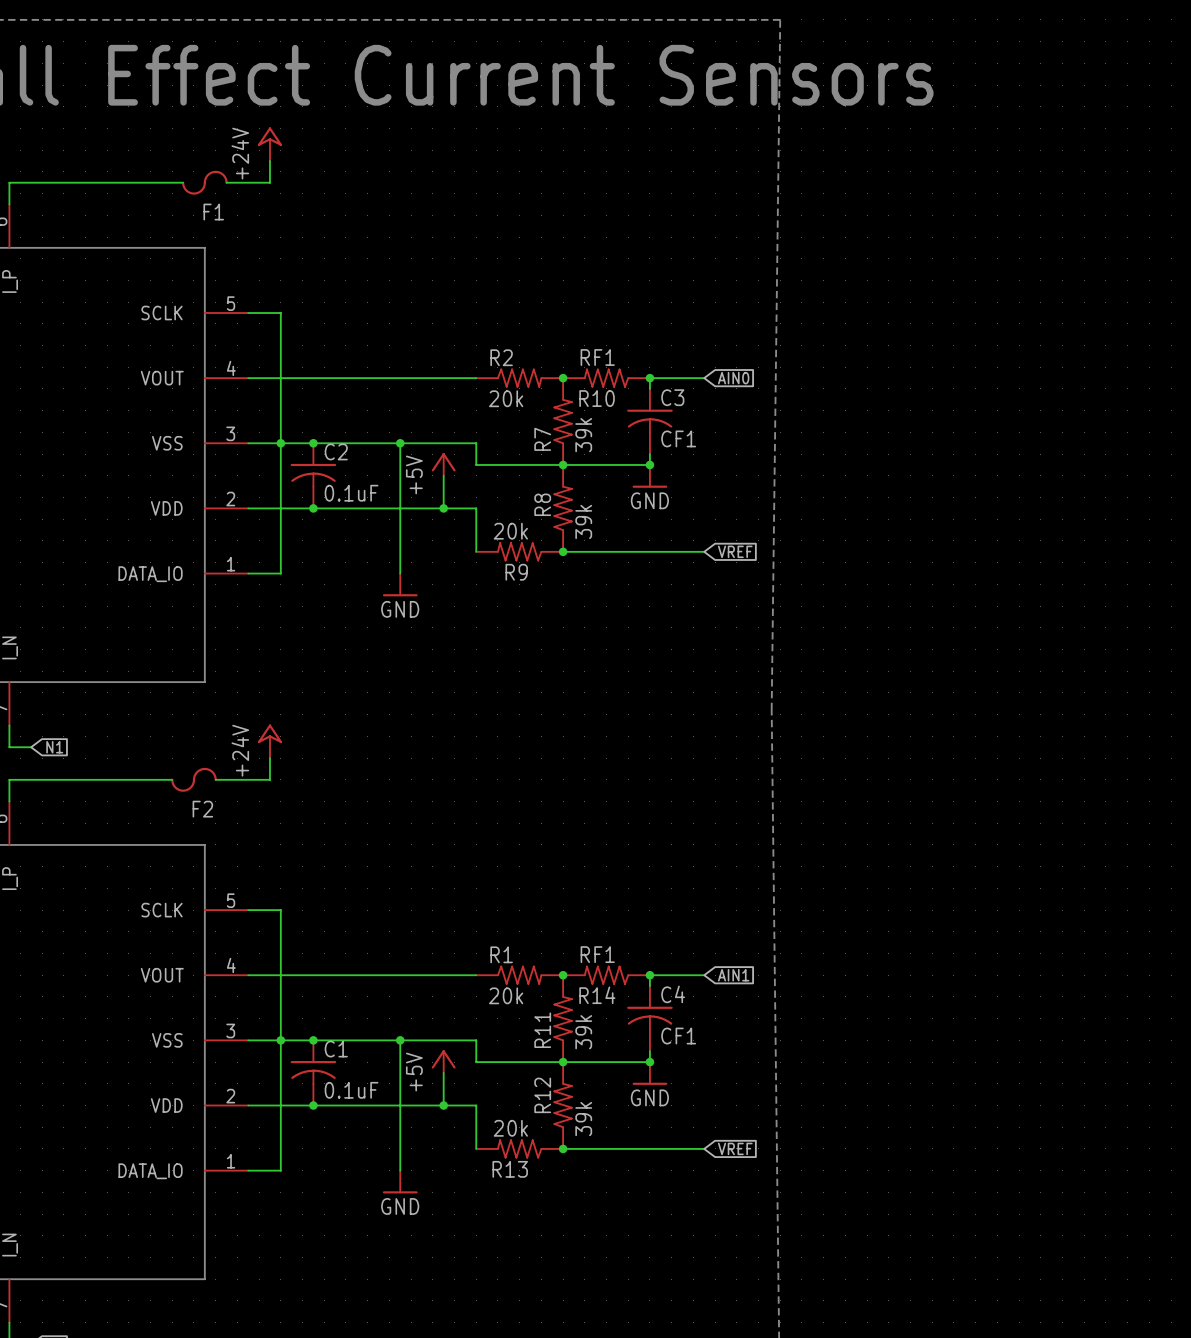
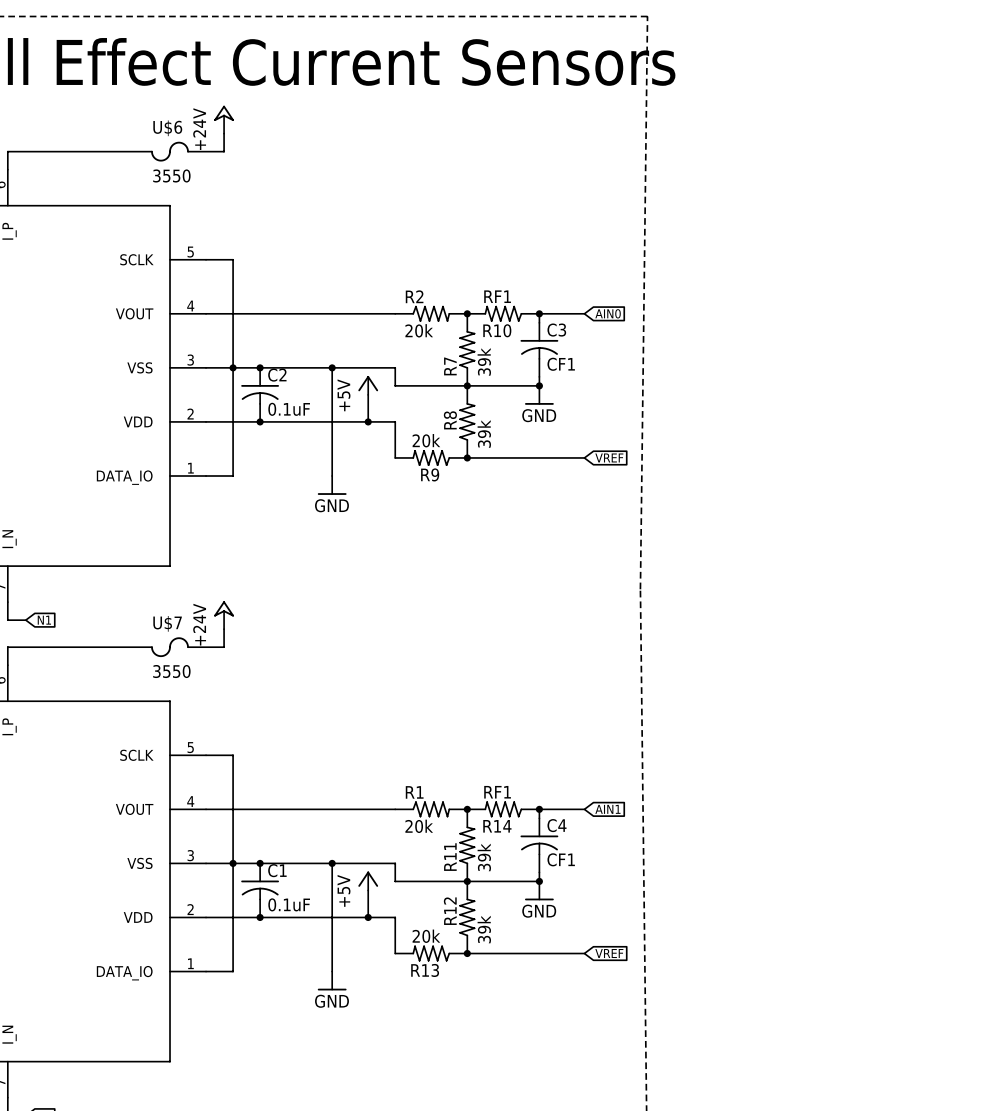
F1 value: none -> 3550 (171, 175)
F1 name: F1 (213, 212) -> U$6 (167, 128)
F2: (193, 779) -> none
U$7: none -> 3550 (170, 647)
wire: (215, 779) (226, 779) -> (142, 647) (151, 647)

